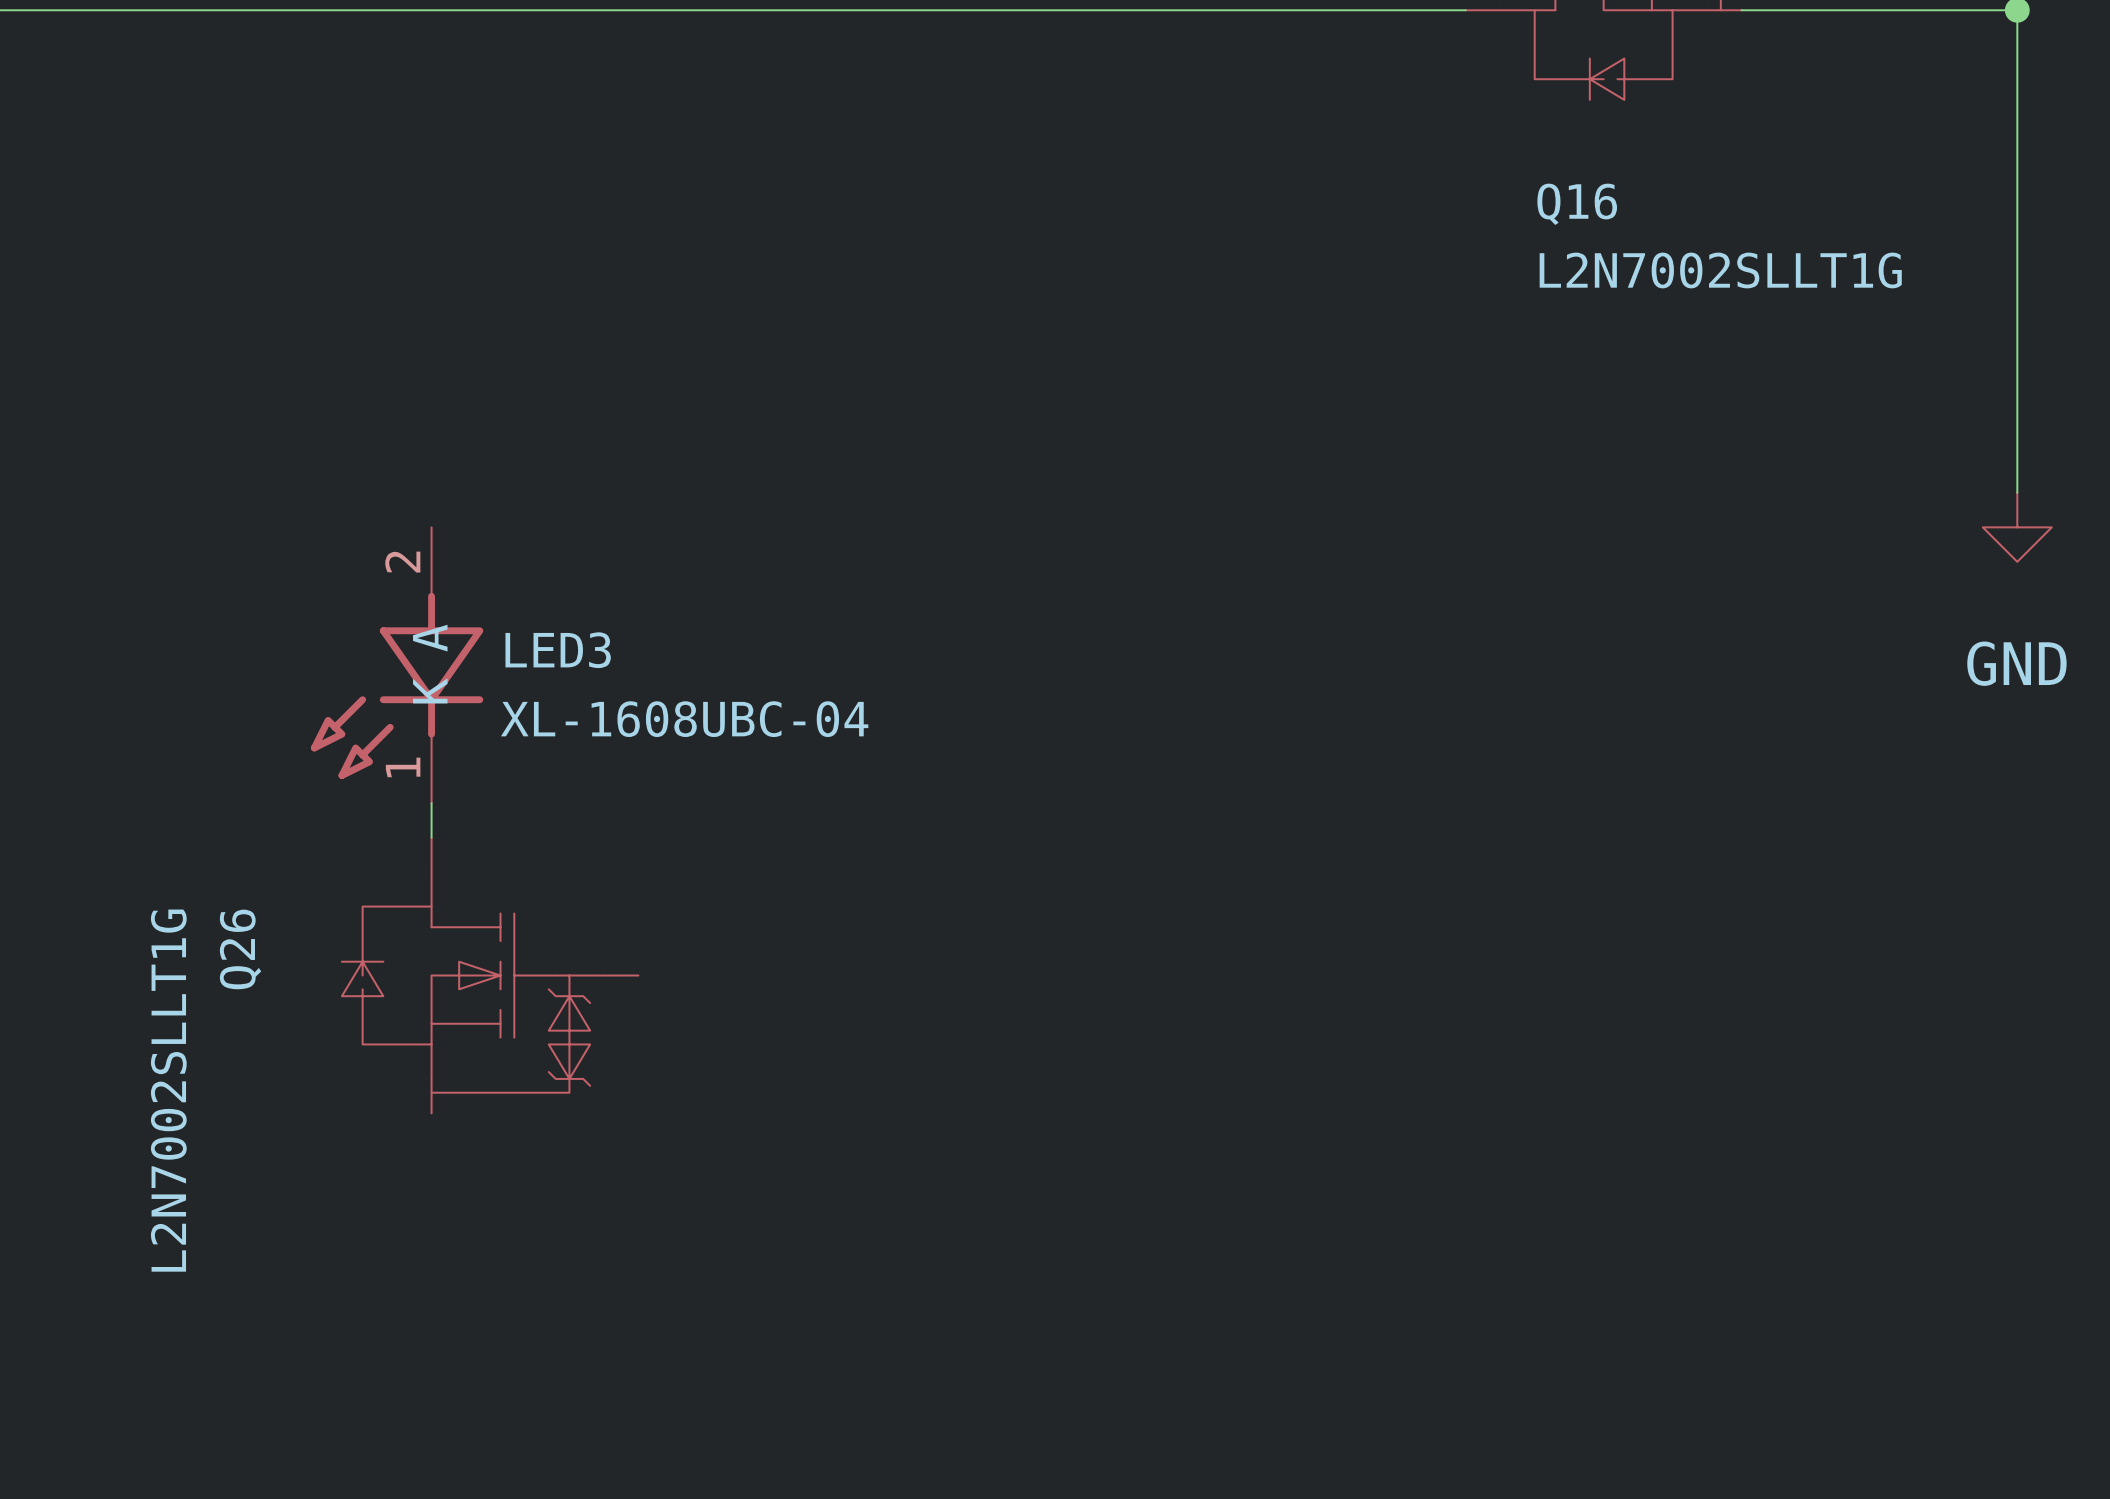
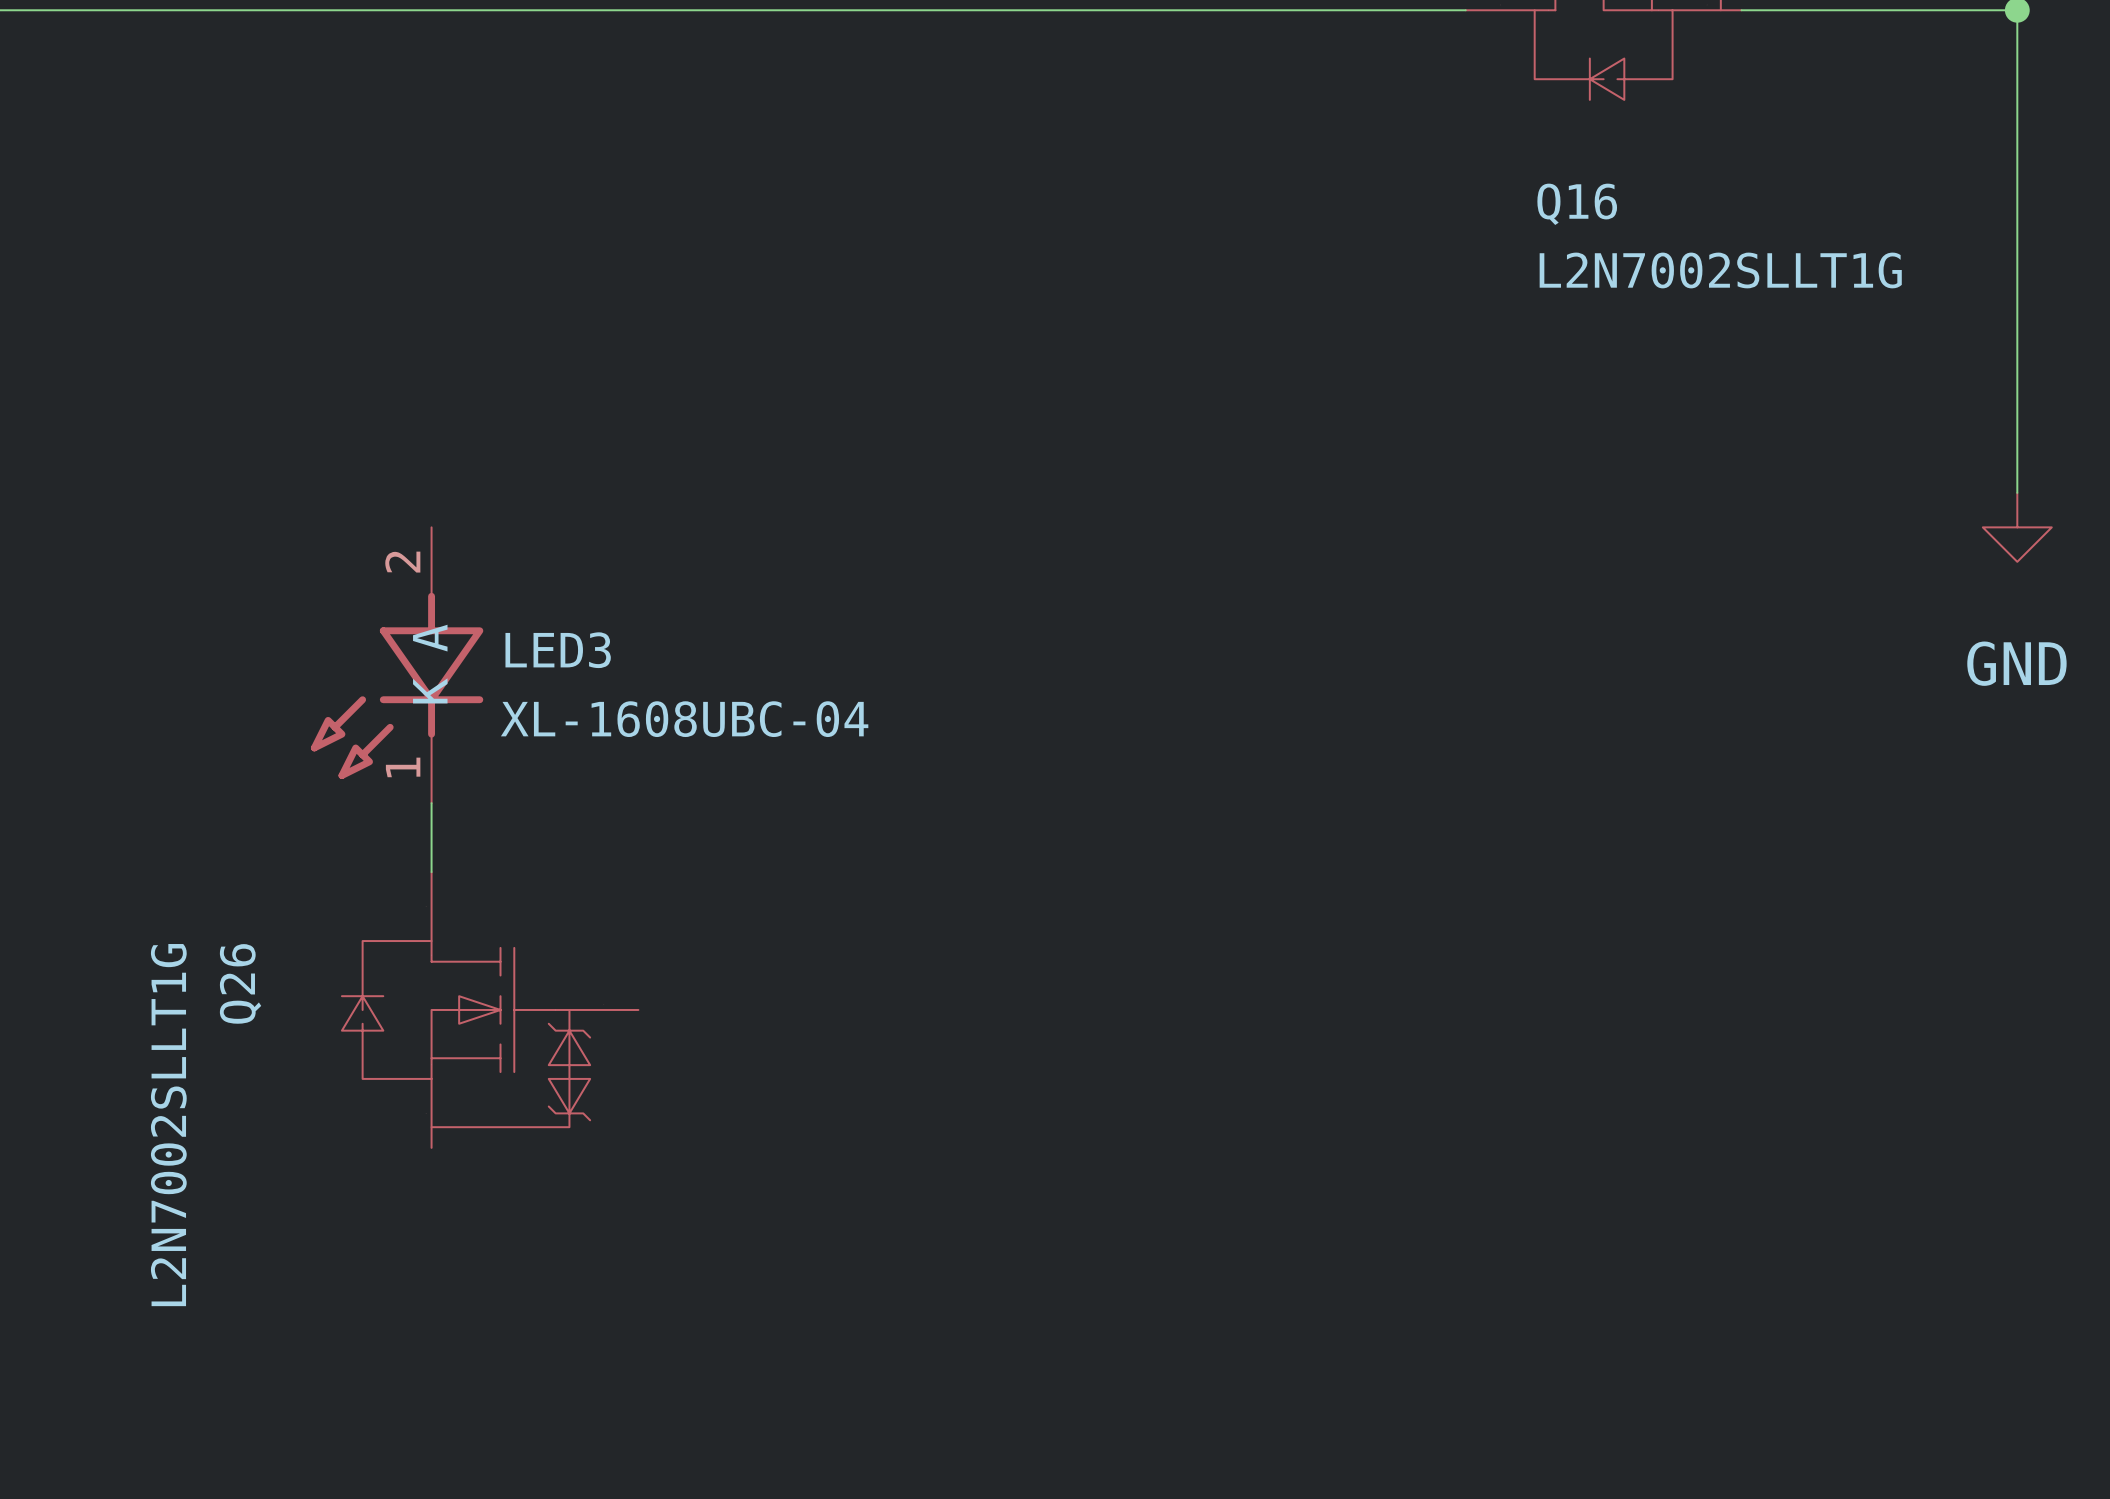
Q26 position: (490, 975) -> (490, 1009)

